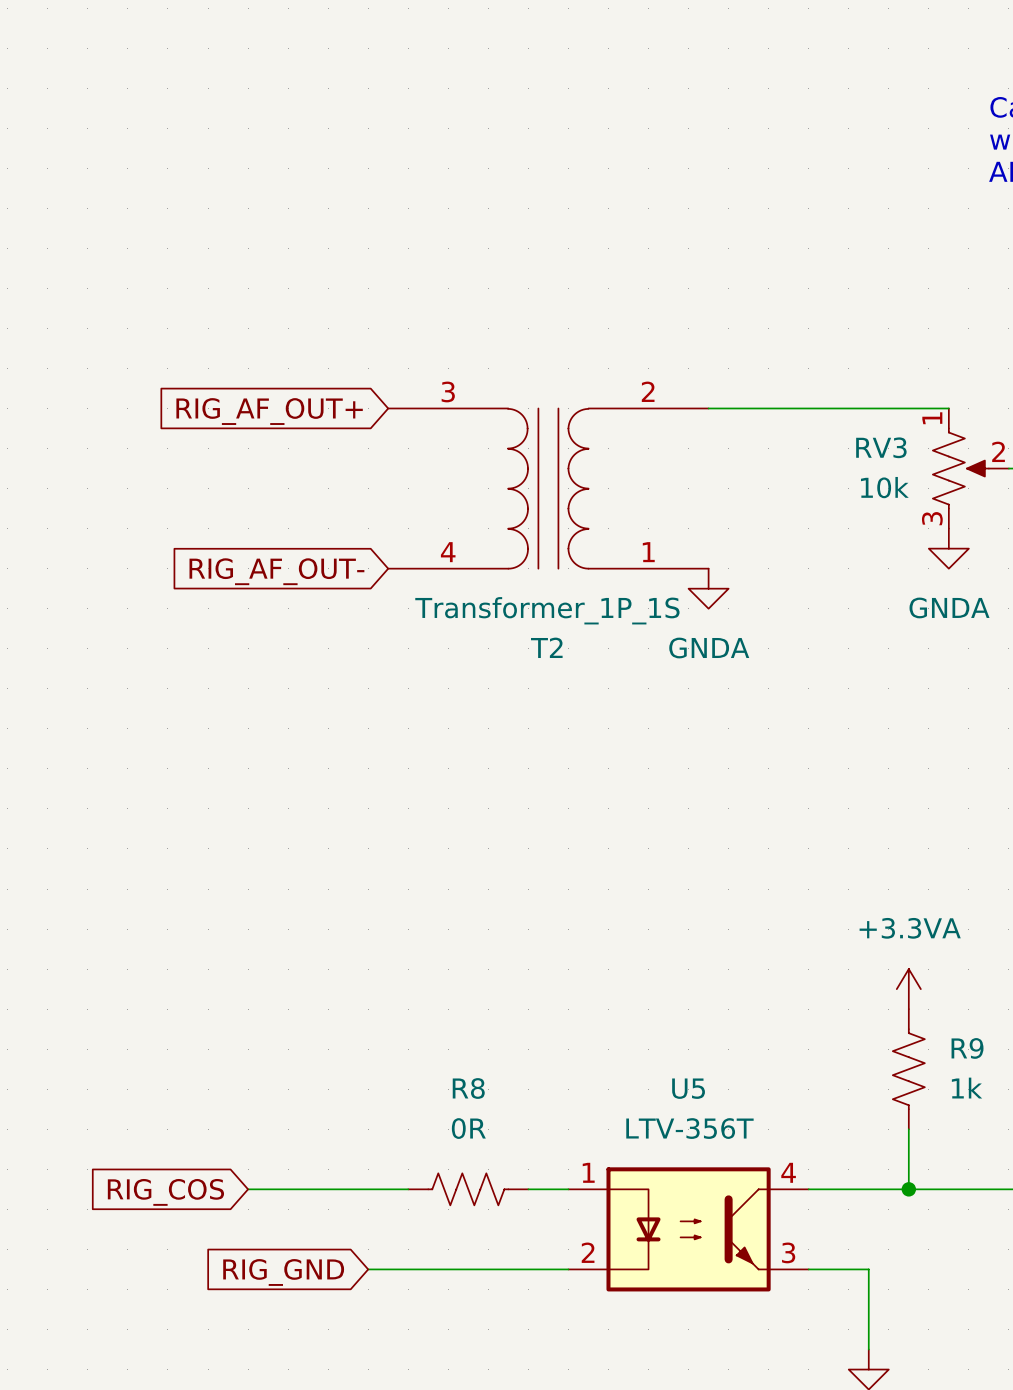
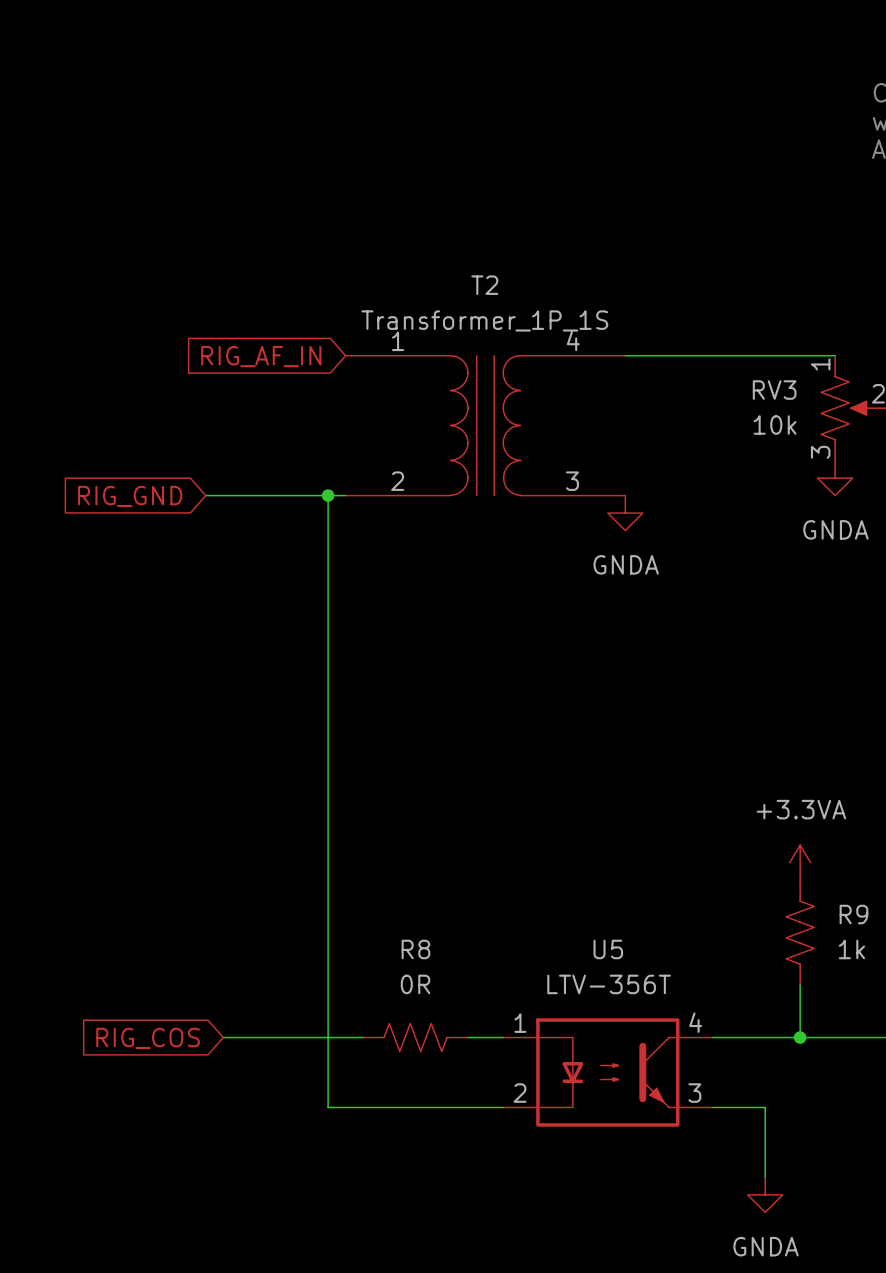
global label: RIG_AF_OUT+ (269, 411) -> RIG_AF_IN (261, 356)
T2 rotation: 0° (548, 488) -> 180° (485, 425)
wire: none -> (205, 495) (345, 495)
wire: none -> (328, 495) (328, 1107)
junction: none -> (328, 495)
global label: none -> RIG_GND (130, 496)
global label: RIG_AF_OUT- (276, 571) -> none
global label: RIG_GND (283, 1272) -> none

